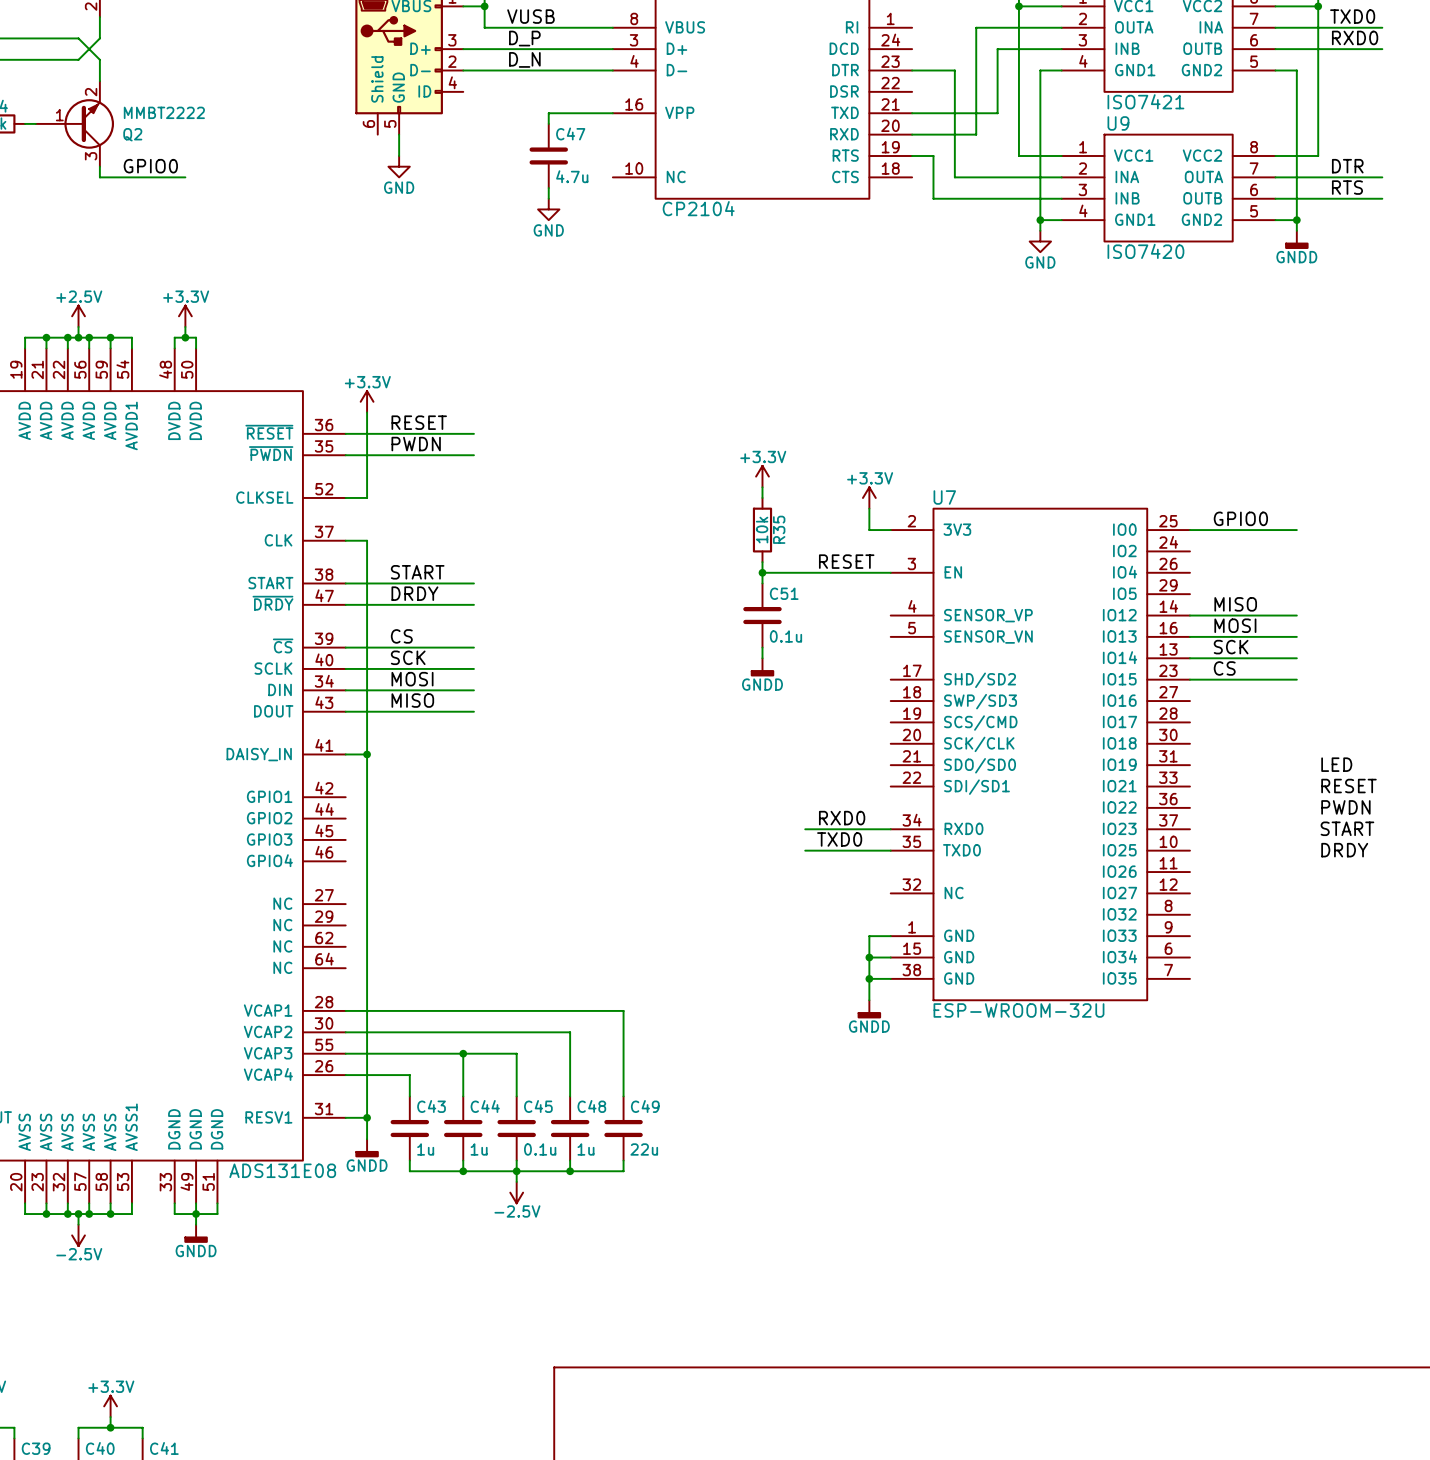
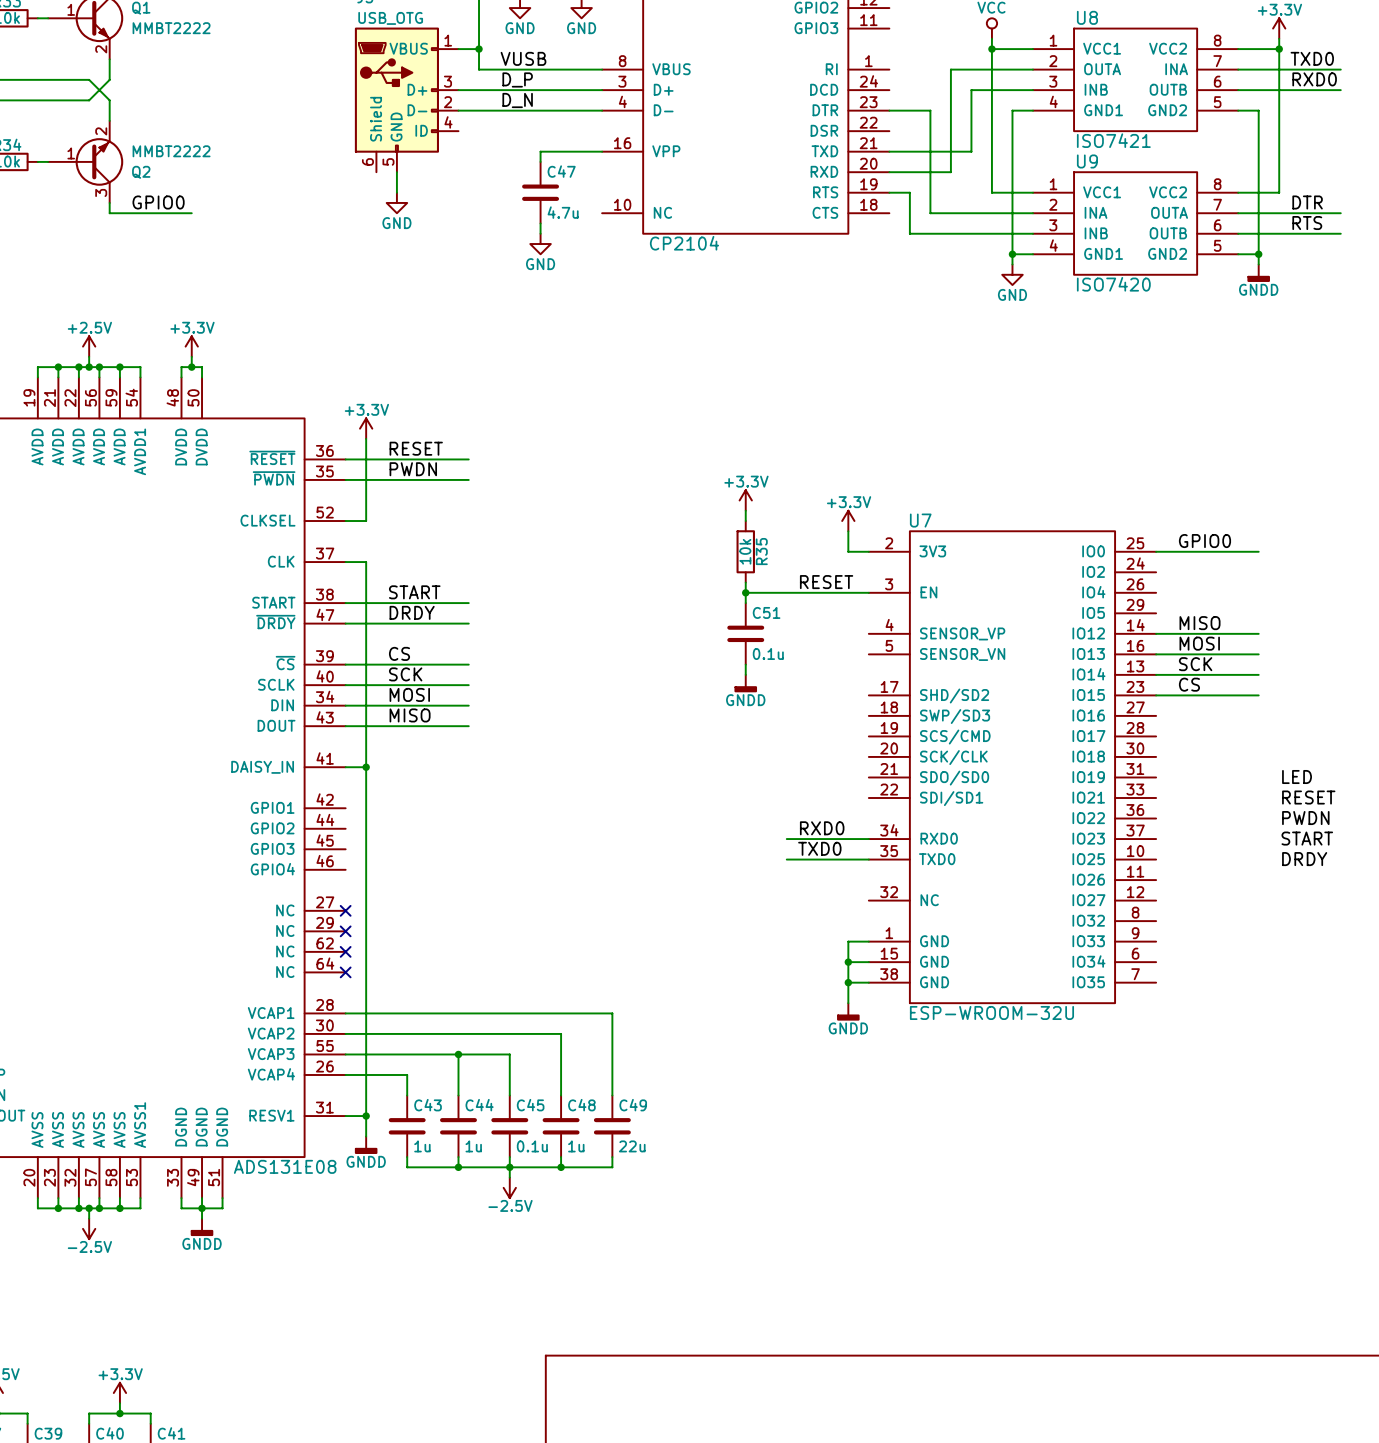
no-connect mark: none -> (345, 910)
no-connect mark: none -> (345, 931)
no-connect mark: none -> (345, 951)
no-connect mark: none -> (345, 972)

